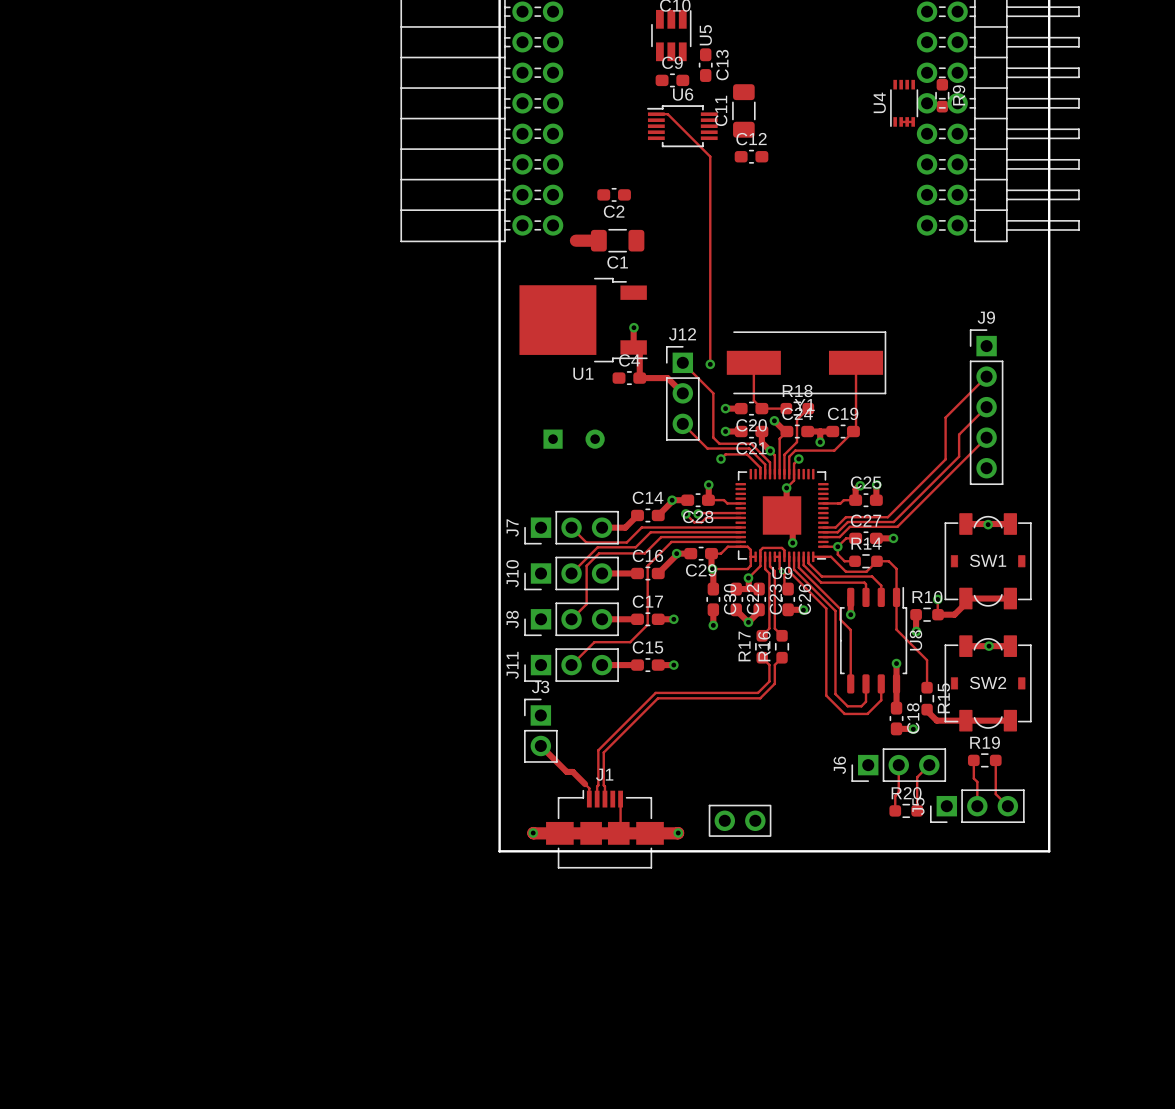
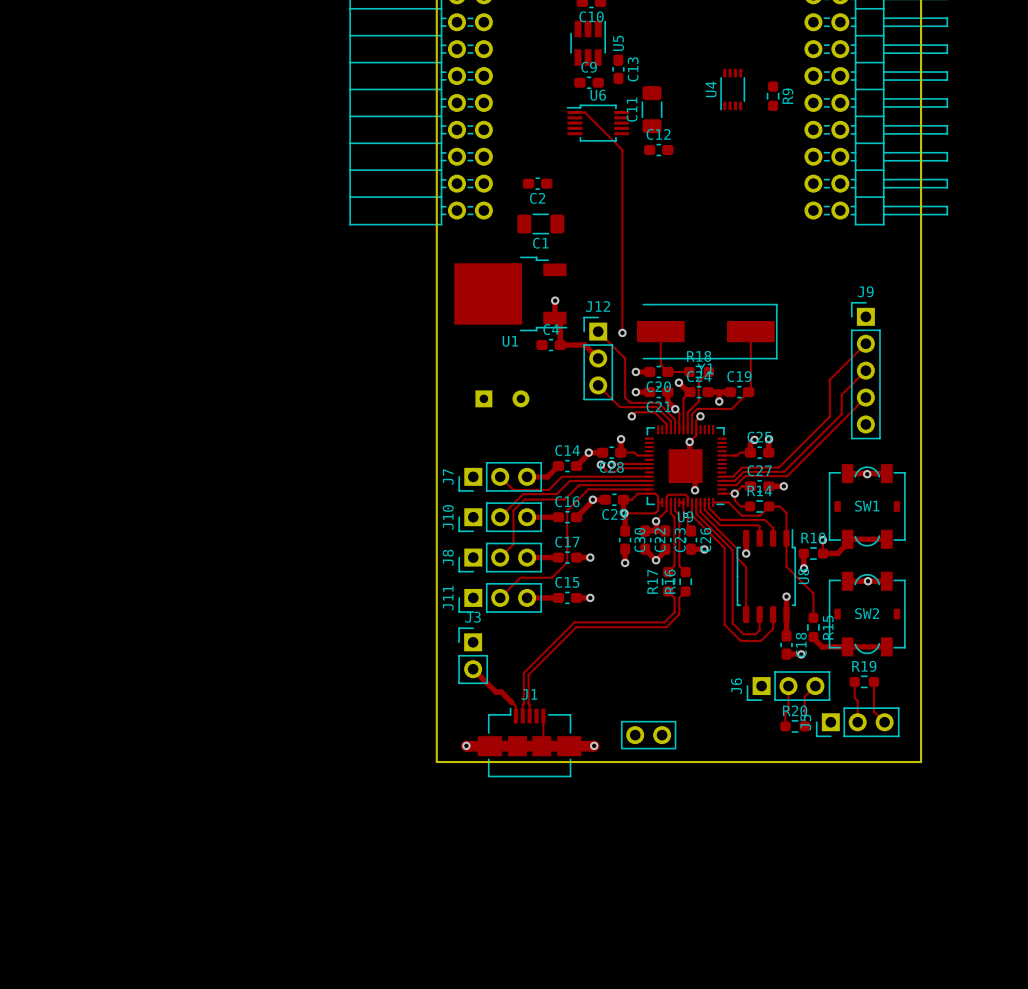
R9 position: (942, 95) -> (773, 96)
U4 position: (904, 103) -> (732, 89)
top track: (901, 121) (913, 121) -> none
top track: (575, 240) (598, 240) -> none

